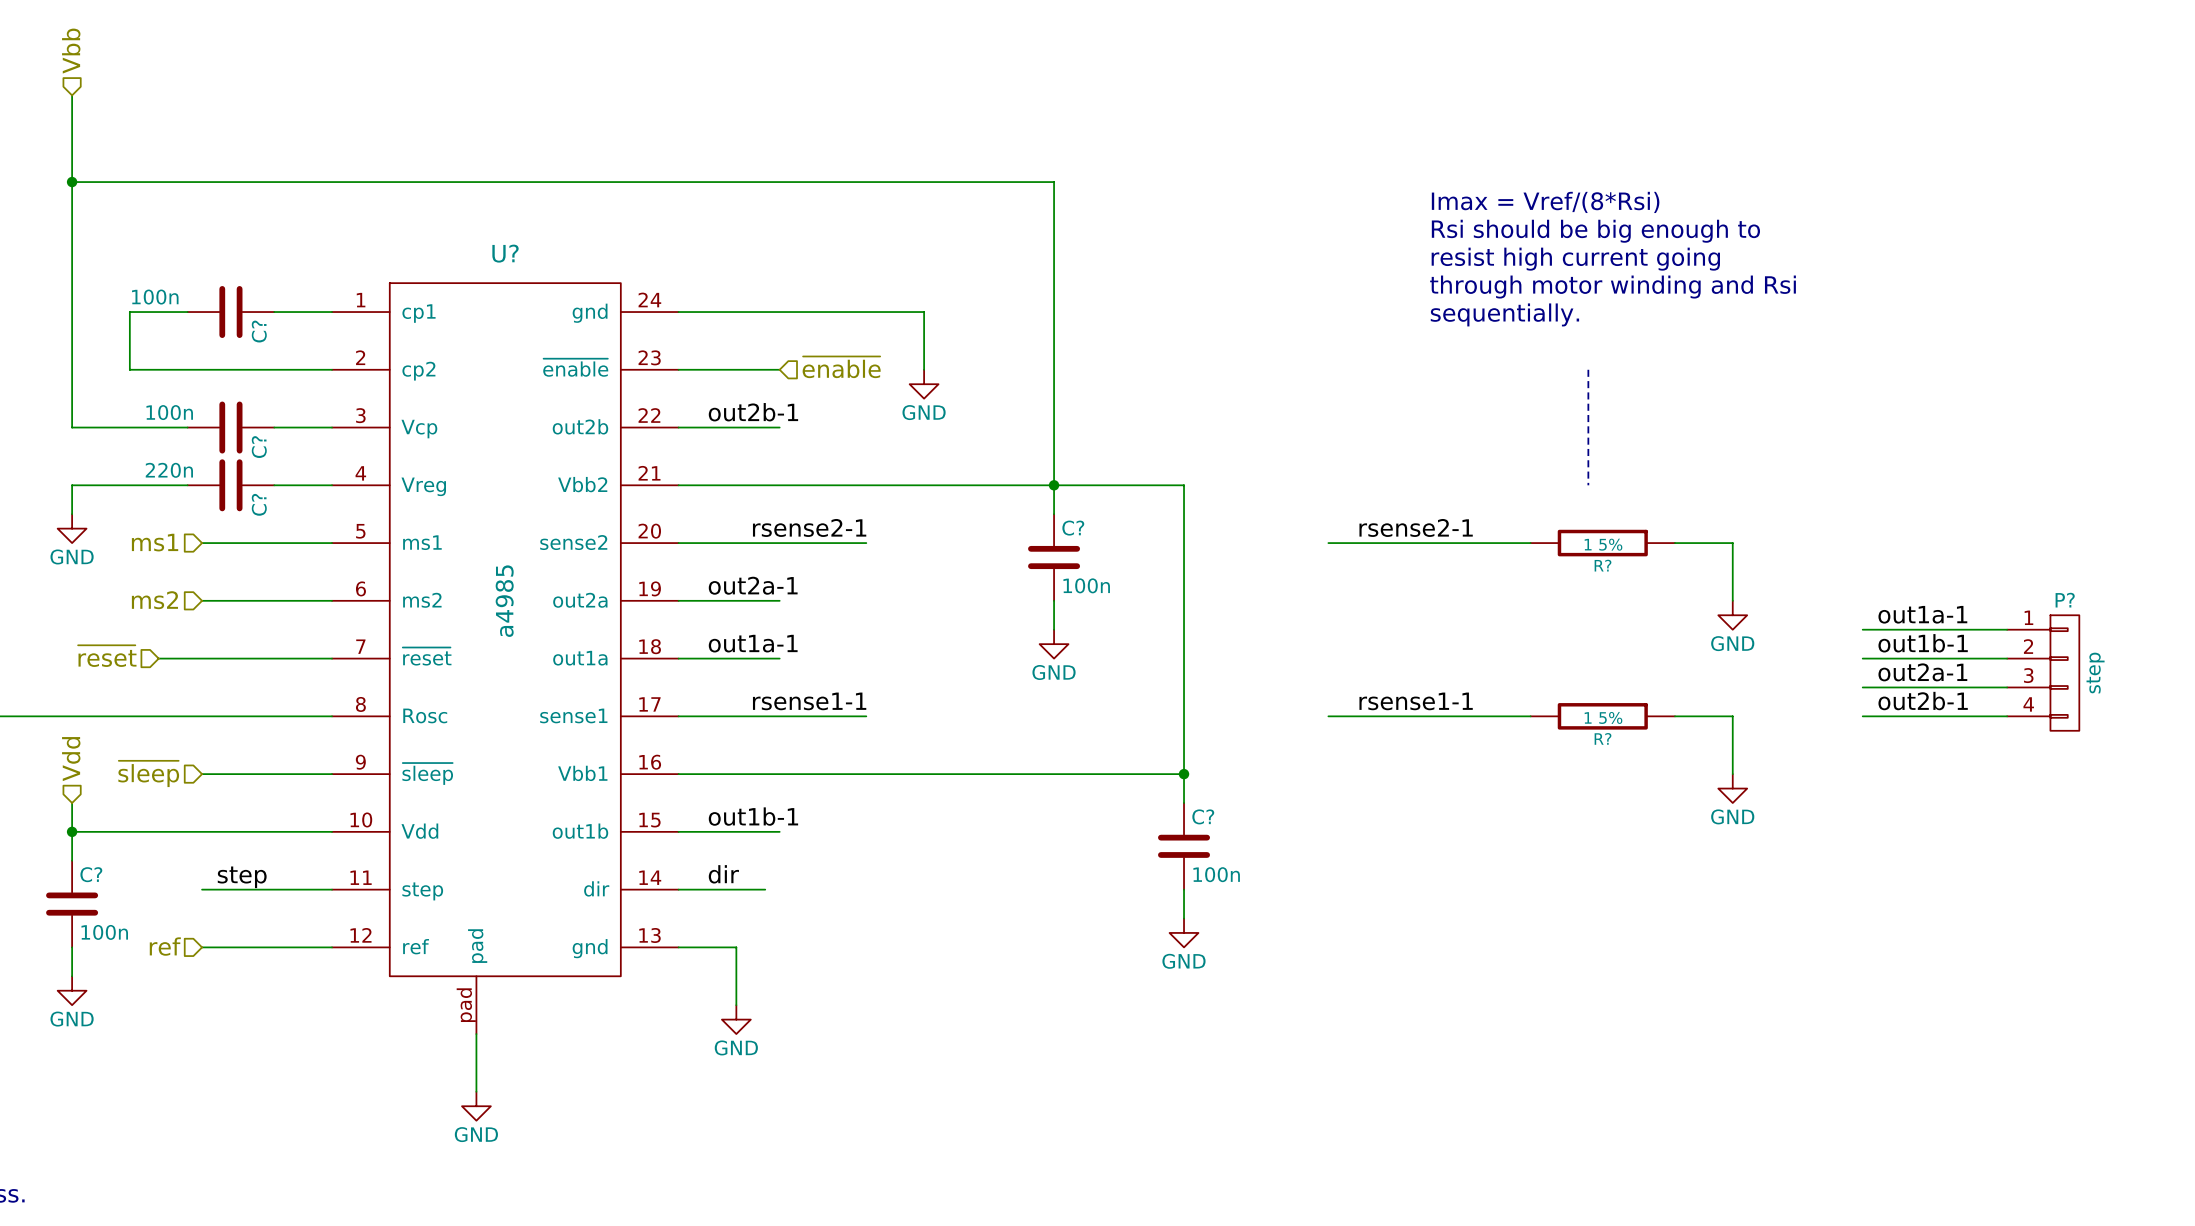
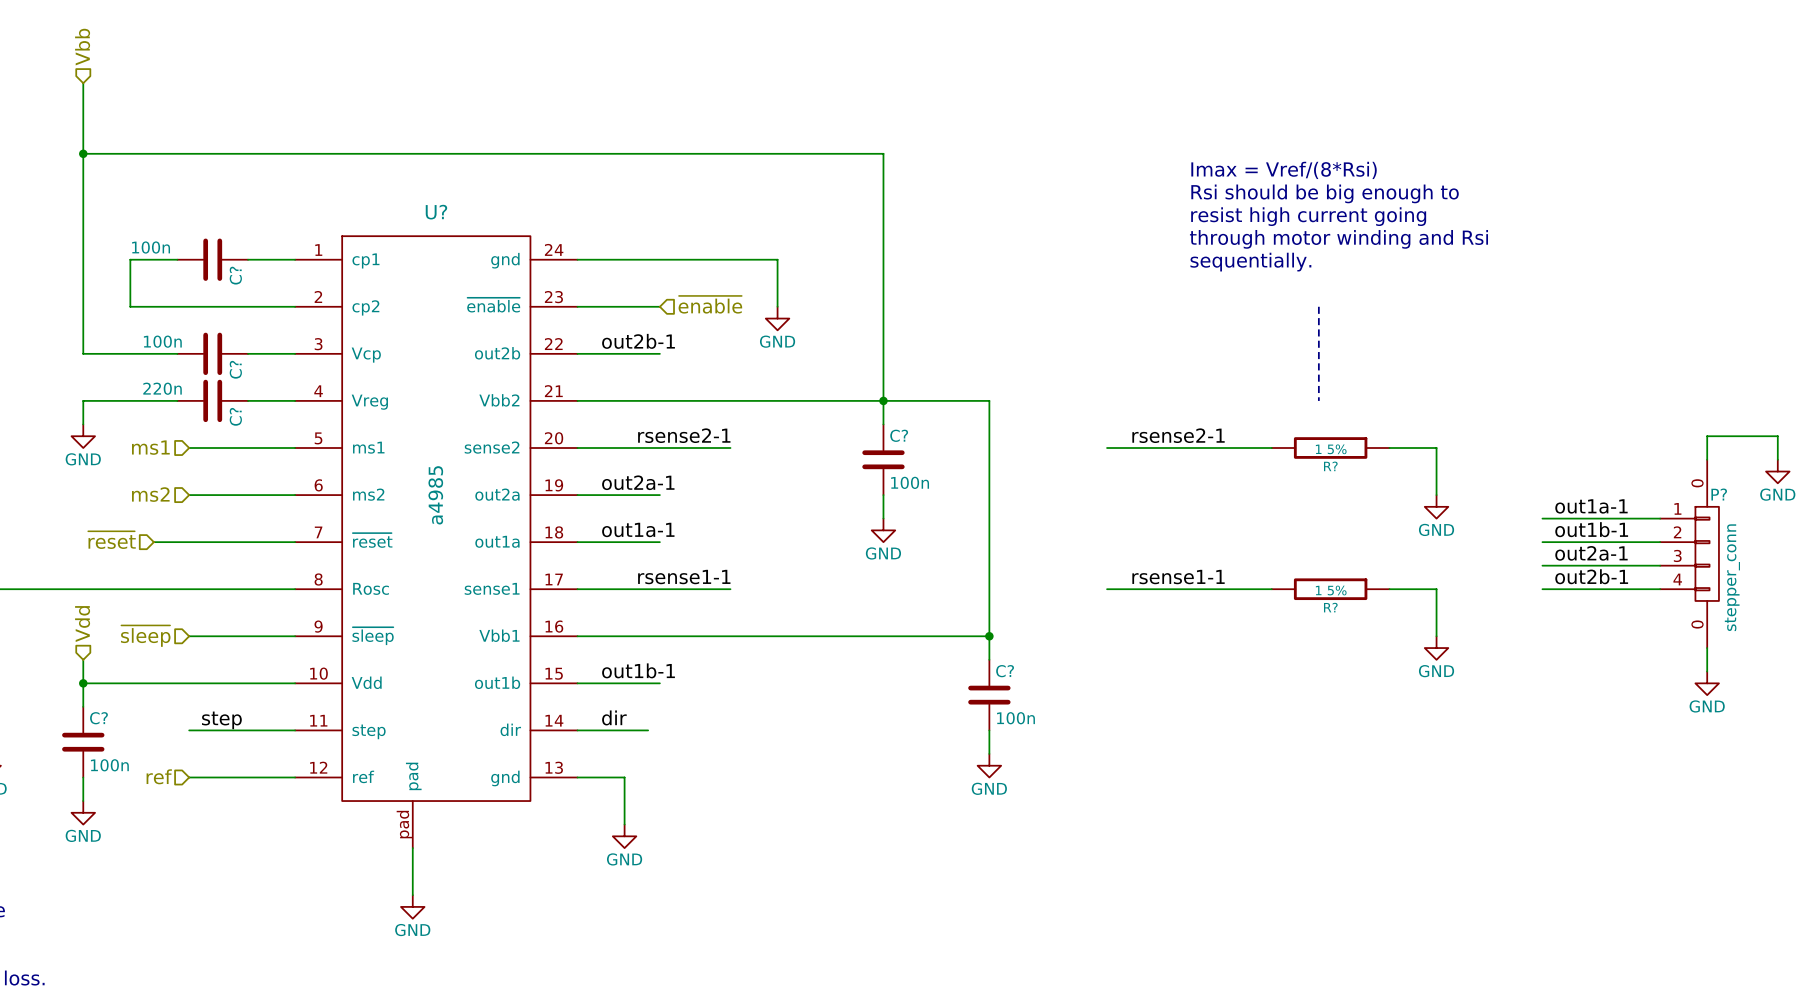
wire: none -> (1707, 459) (1707, 436) (1777, 436) (1777, 459)
power symbol: none -> GND (1777, 471)
P? symbol: [2007, 615, 2080, 731] -> [1660, 459, 1719, 649]
P? value: step (2095, 673) -> stepper_conn (1732, 577)
wire: none -> (1707, 648) (1707, 671)
power symbol: none -> GND (1707, 683)

